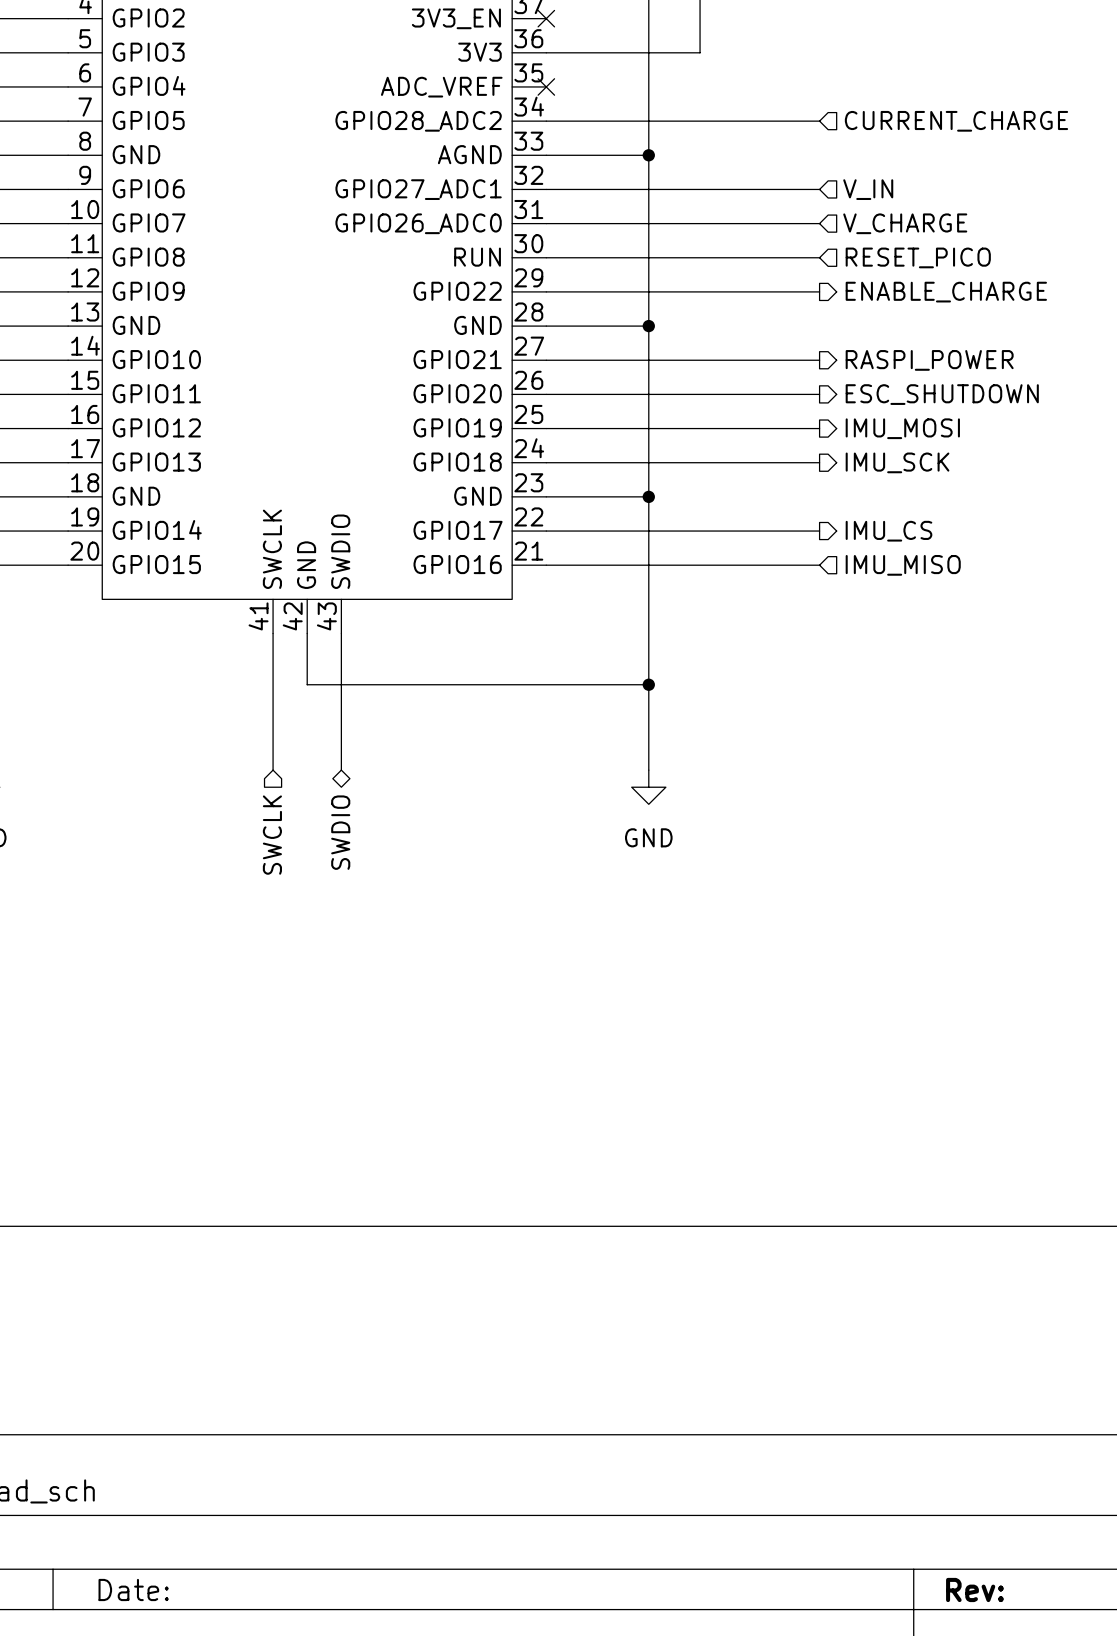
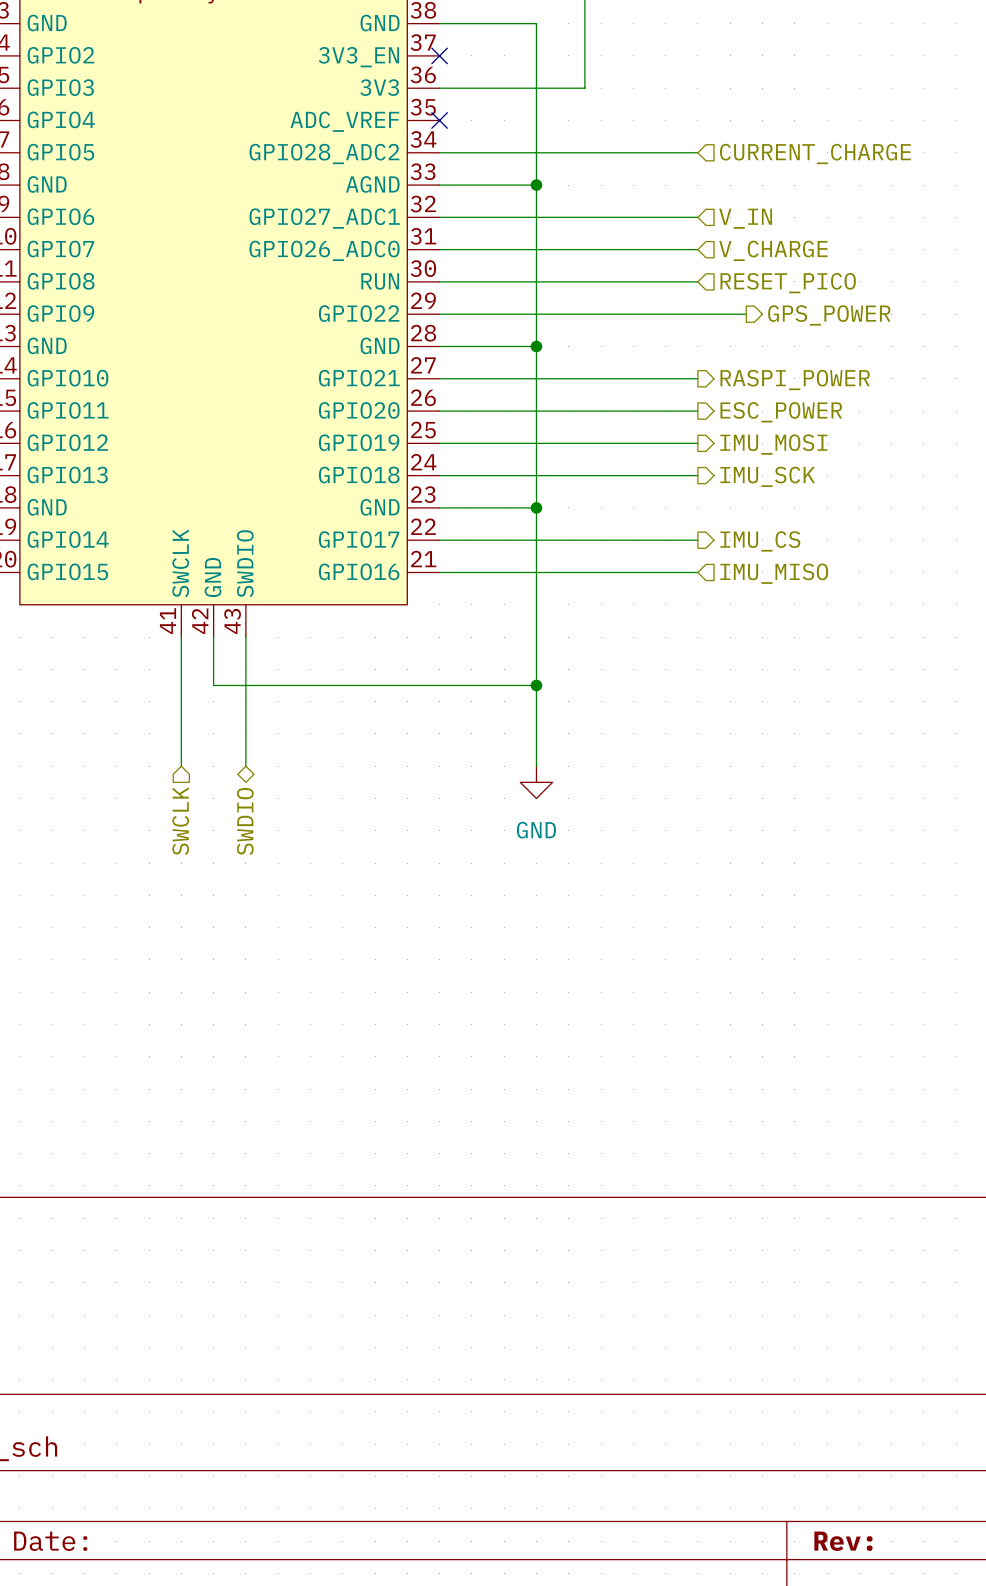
wire: none -> (697, 314) (746, 314)
hierarchical label: ENABLE_CHARGE (946, 292) -> none
hierarchical label: none -> GPS_POWER (829, 315)
hierarchical label: ESC_SHUTDOWN (942, 394) -> ESC_POWER (781, 412)

